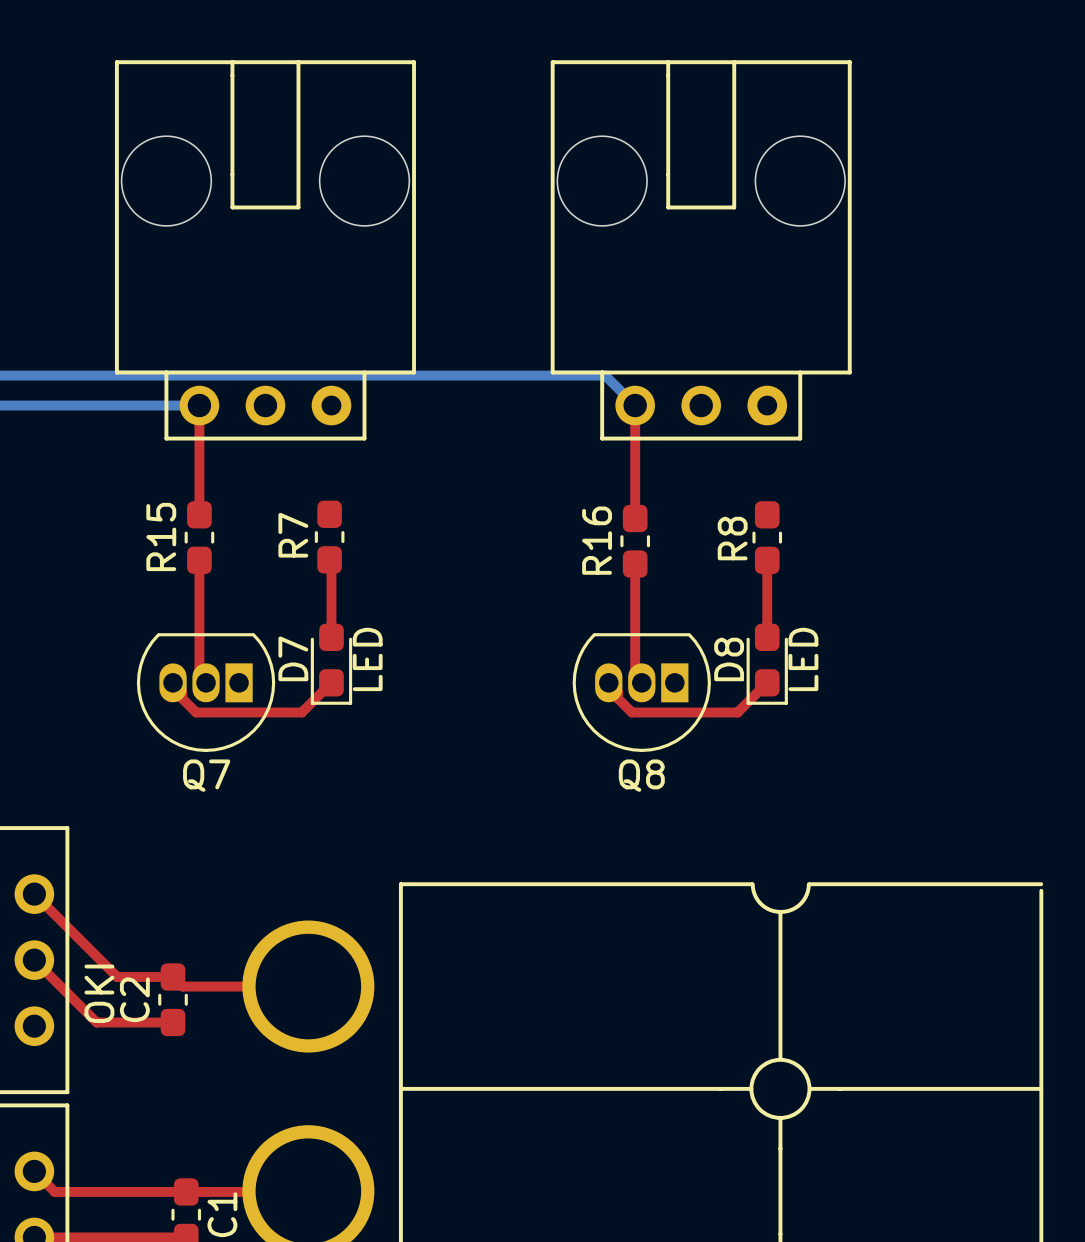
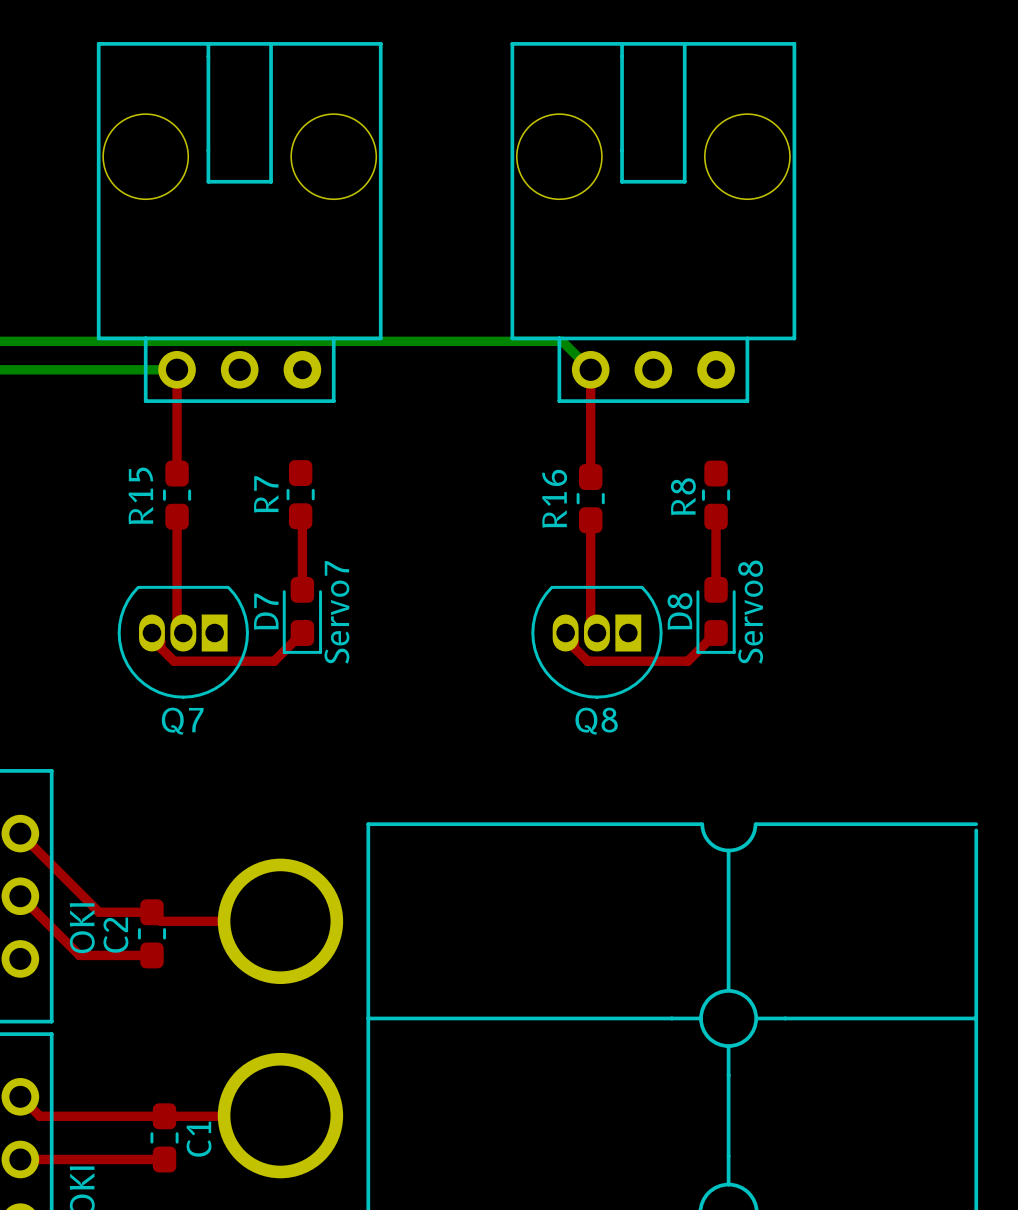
D7 value: LED (367, 659) -> Servo7 (336, 612)
D8 value: LED (803, 659) -> Servo8 (750, 612)

